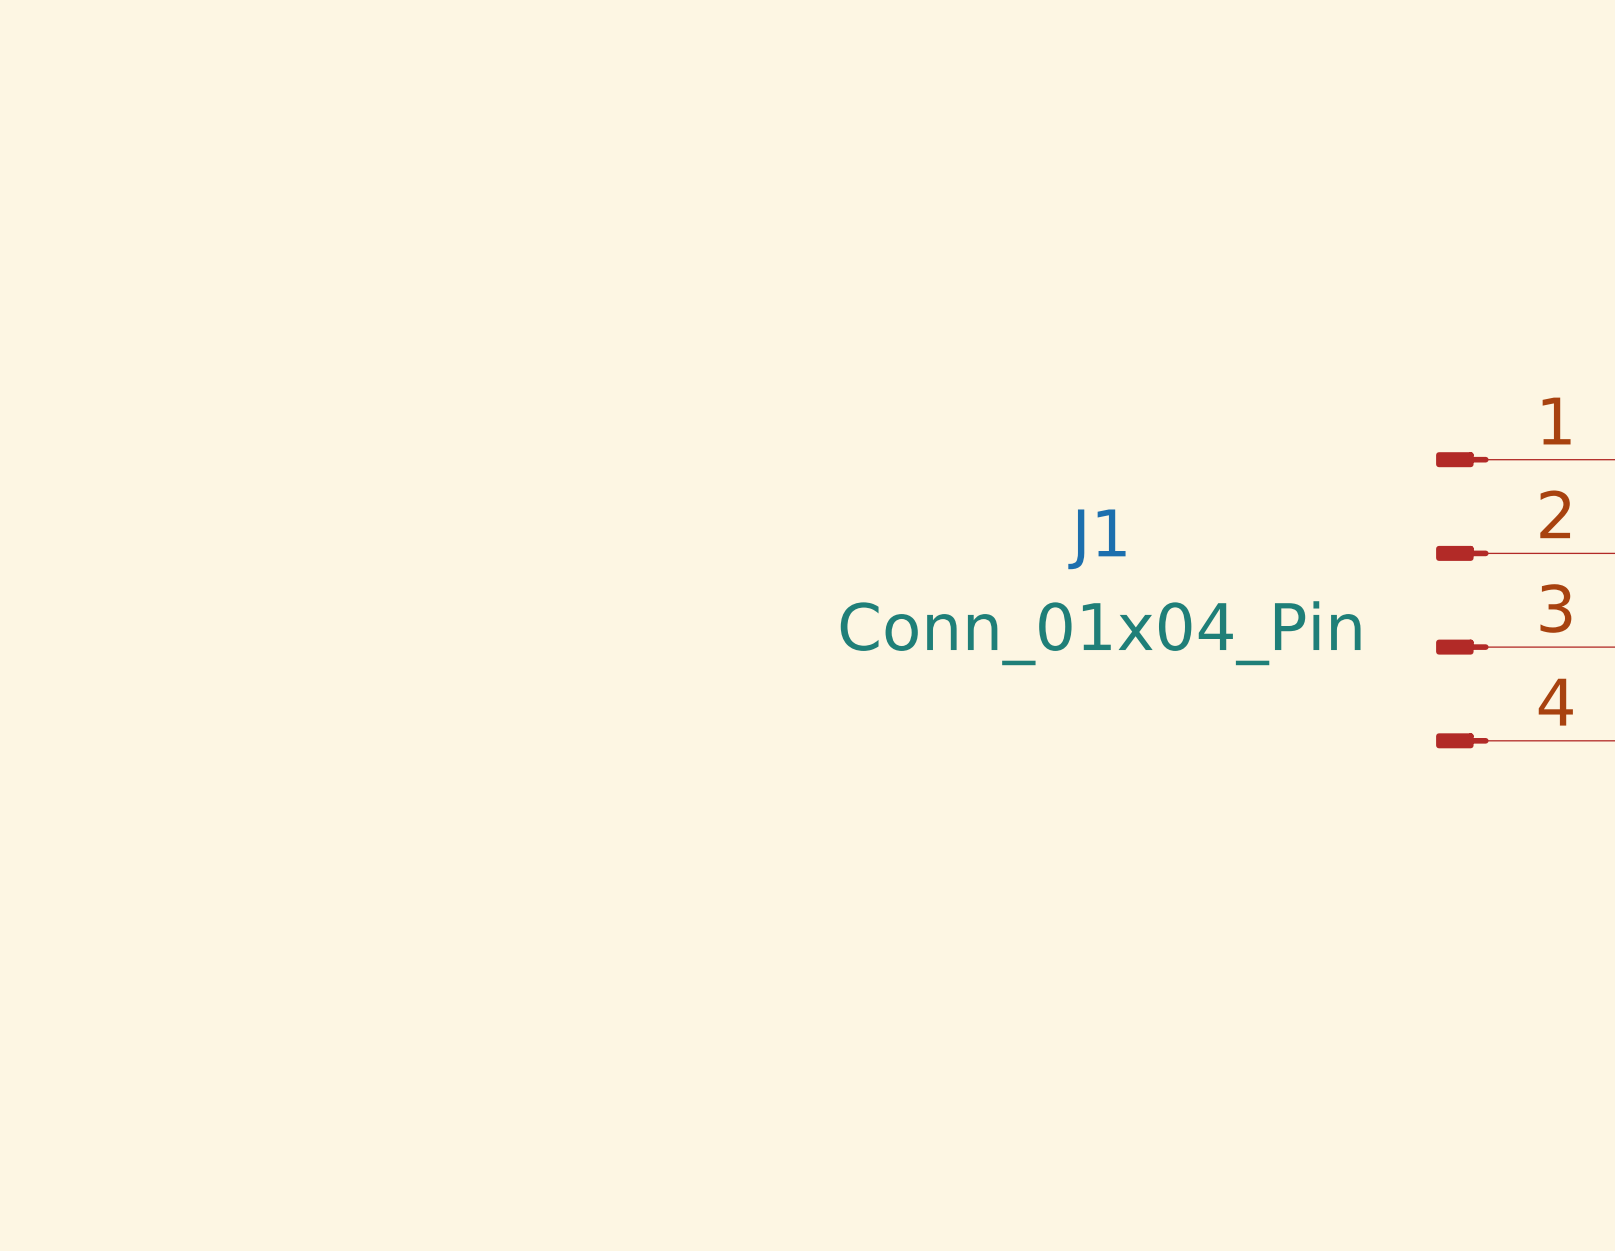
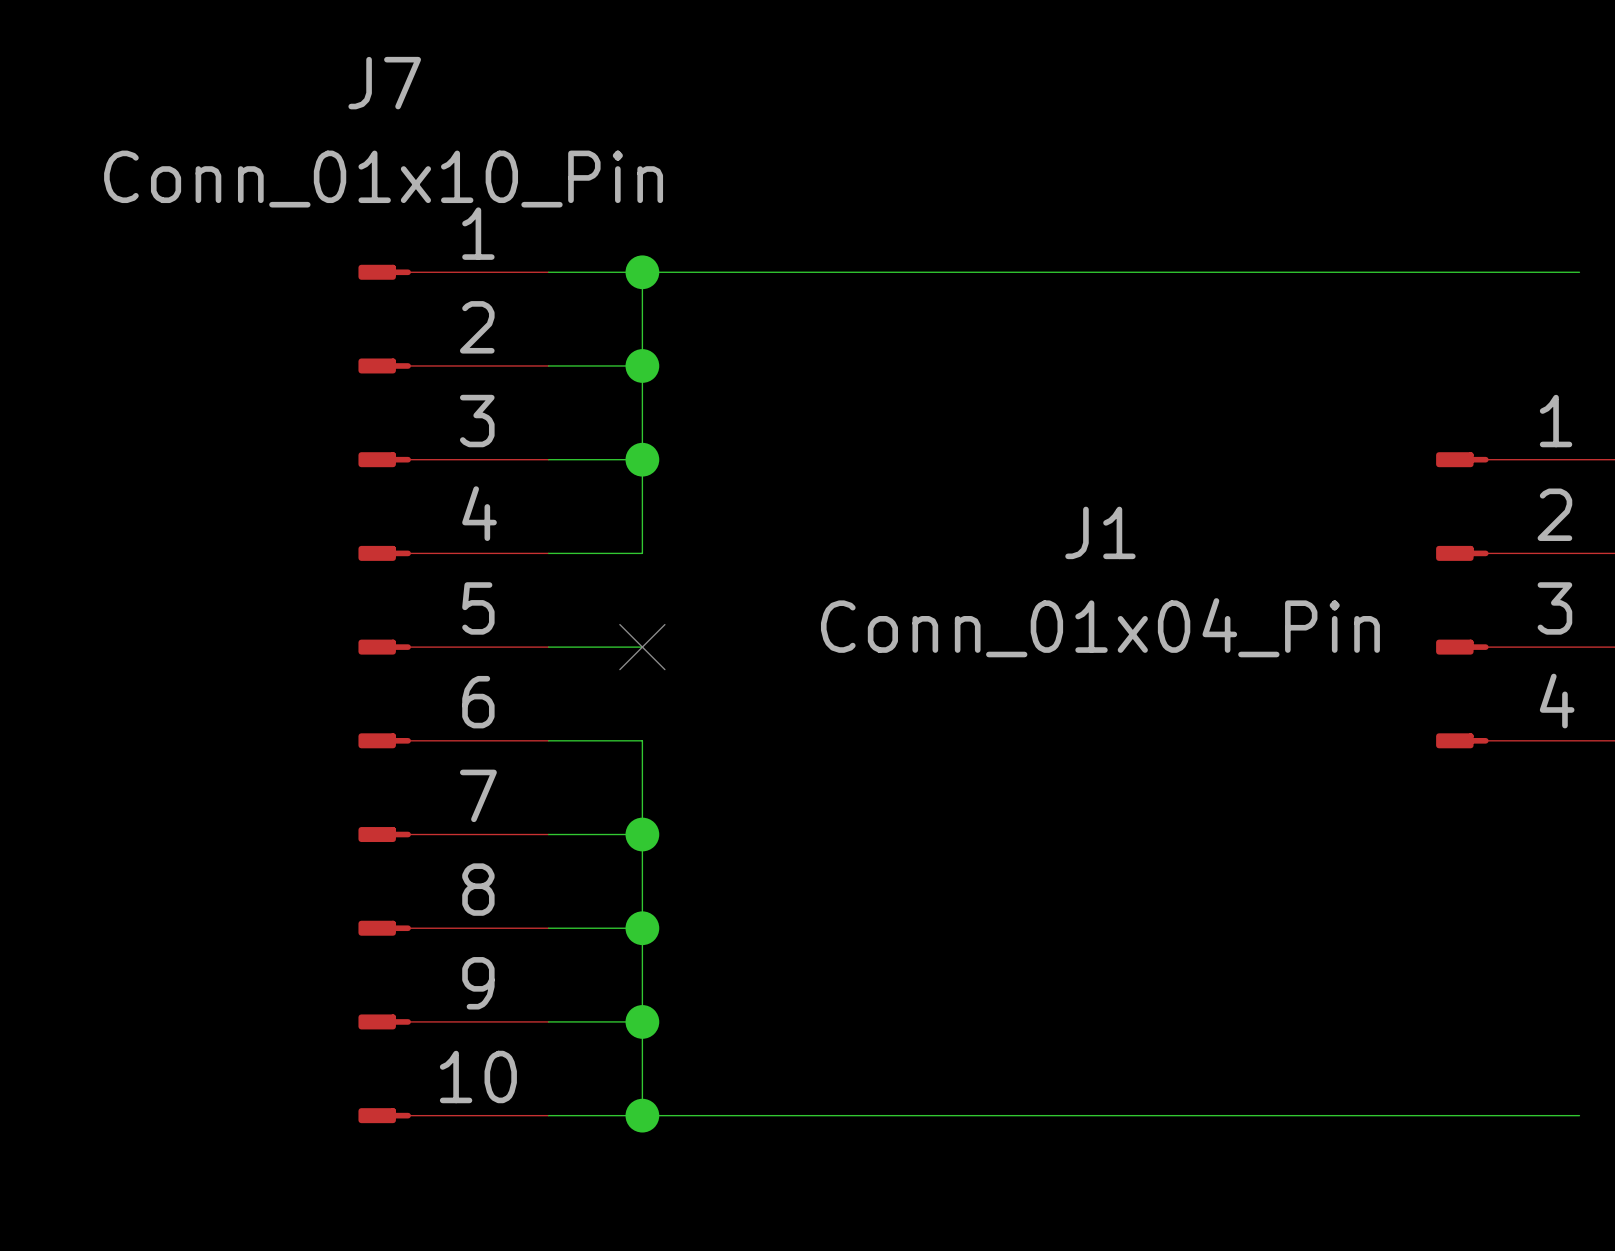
wire: none -> (548, 272) (1579, 272)
wire: none -> (642, 272) (642, 553) (548, 553)
junction: none -> (642, 272)
wire: none -> (548, 365) (642, 365)
junction: none -> (642, 365)
wire: none -> (548, 459) (642, 459)
junction: none -> (642, 459)
wire: none -> (548, 647) (642, 647)
no-connect mark: none -> (642, 647)
J7: none -> Conn_01x10_Pin (453, 693)
wire: none -> (548, 740) (642, 740) (642, 1115)
wire: none -> (548, 834) (642, 834)
junction: none -> (642, 834)
wire: none -> (548, 928) (642, 928)
junction: none -> (642, 928)
wire: none -> (548, 1021) (642, 1021)
junction: none -> (642, 1021)
wire: none -> (548, 1115) (1579, 1115)
junction: none -> (642, 1115)

